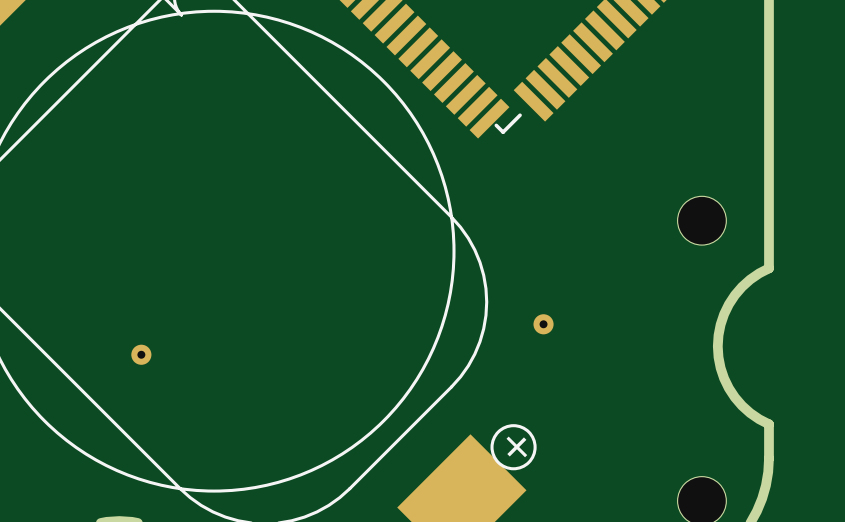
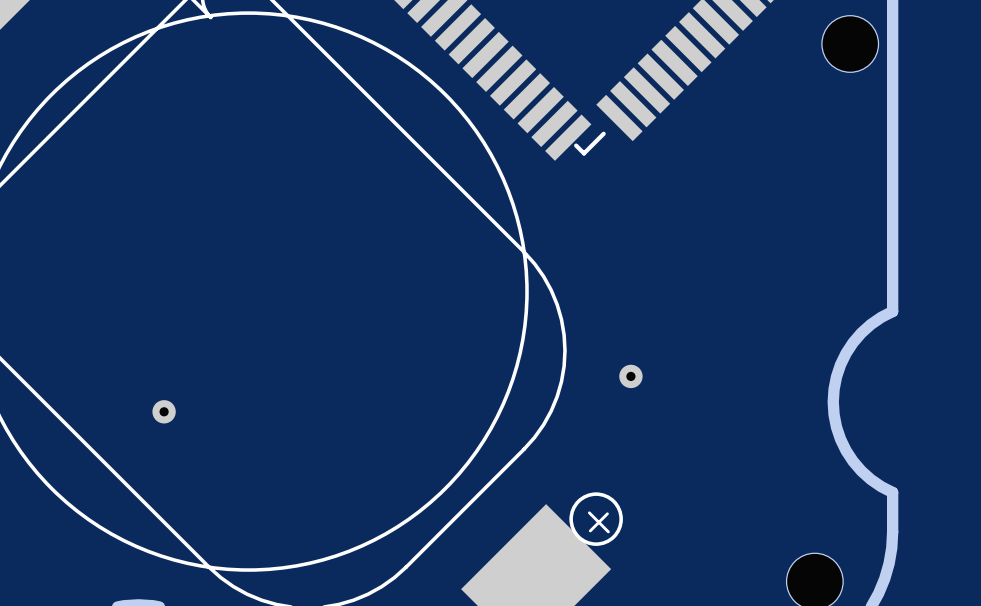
hole position: (701, 220) -> (850, 43)

